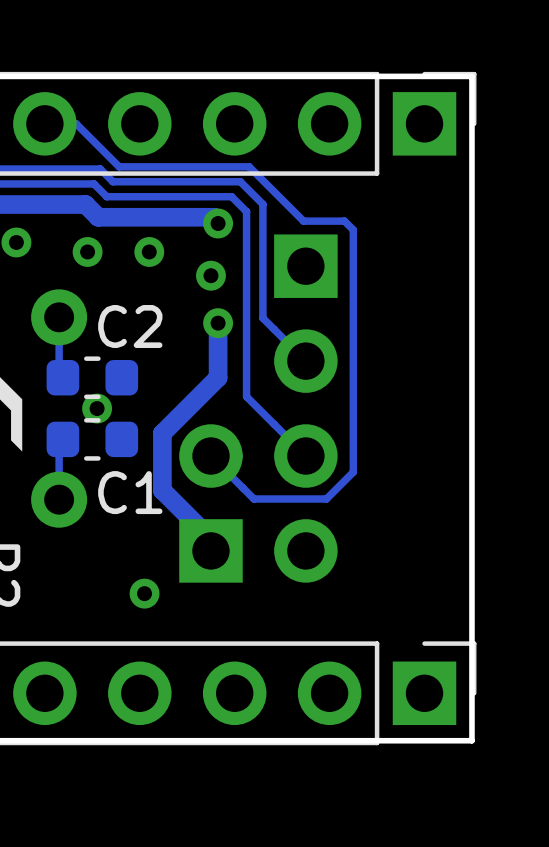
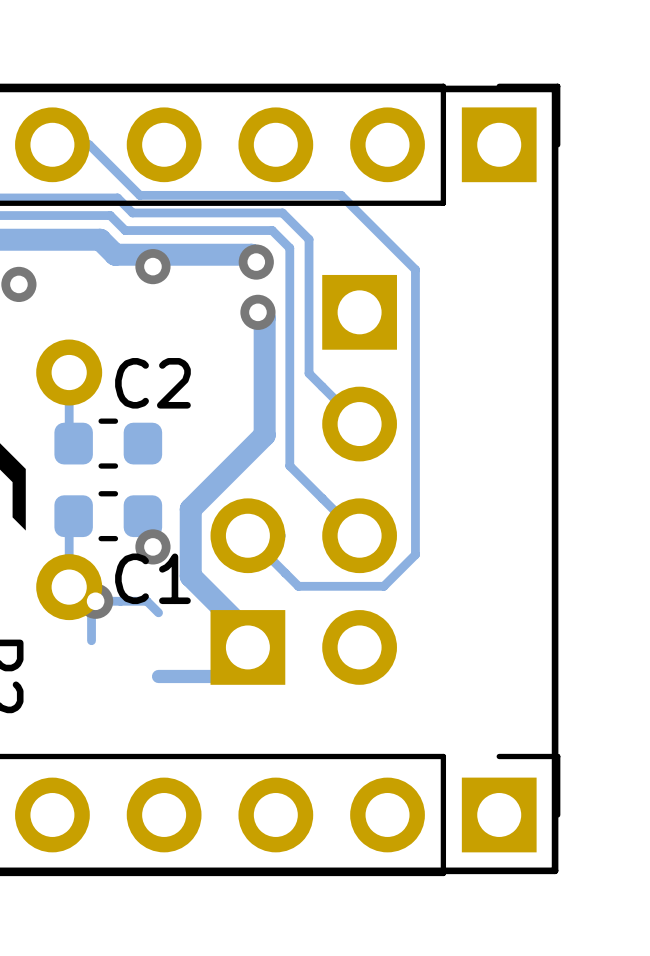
track: (249, 166) (303, 221) (344, 221) -> (292, 195) (341, 195) (405, 259)
via: (87, 251) -> none
via position: (149, 251) -> (152, 266)
via position: (210, 275) -> (257, 312)
via: (218, 323) -> none
track: (220, 323) (218, 325) (218, 377) -> (259, 312) (264, 317) (264, 435) (256, 443)
via: (97, 408) -> none
via: none -> (152, 546)
via: none -> (95, 601)
track: none -> (158, 612) (147, 601) (95, 601) (91, 605) (91, 640)
track: none -> (224, 676) (158, 676)
via: (144, 593) -> none

